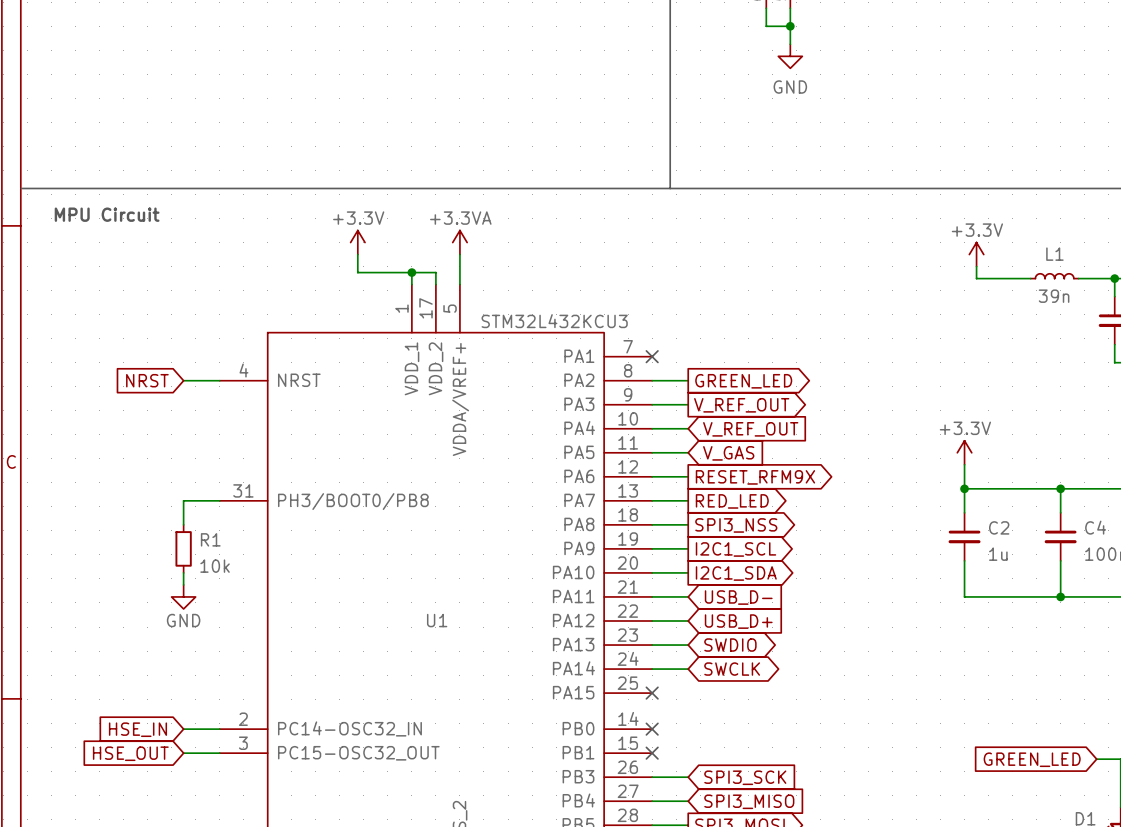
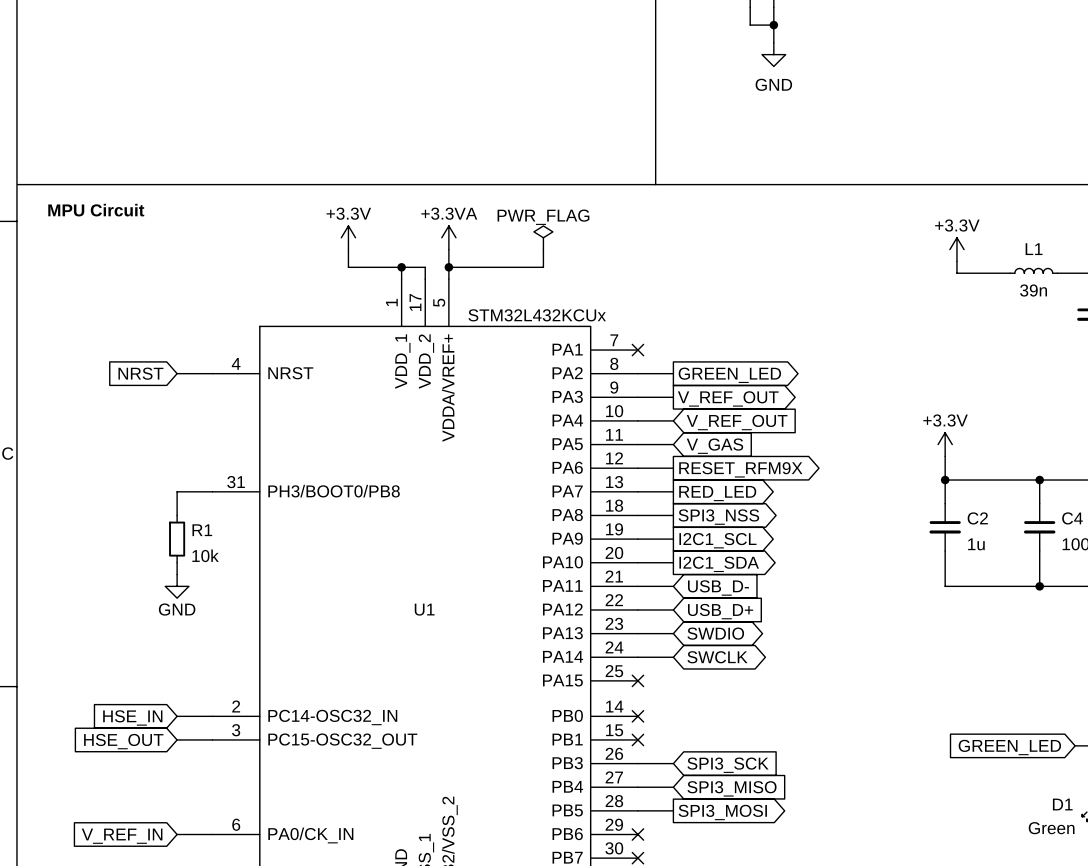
power symbol: none -> PWR_FLAG (543, 237)
wire: none -> (543, 249) (543, 267) (448, 267)
junction: none -> (448, 267)
U1 value: STM32L432KCU3 (554, 321) -> STM32L432KCUx (537, 315)

